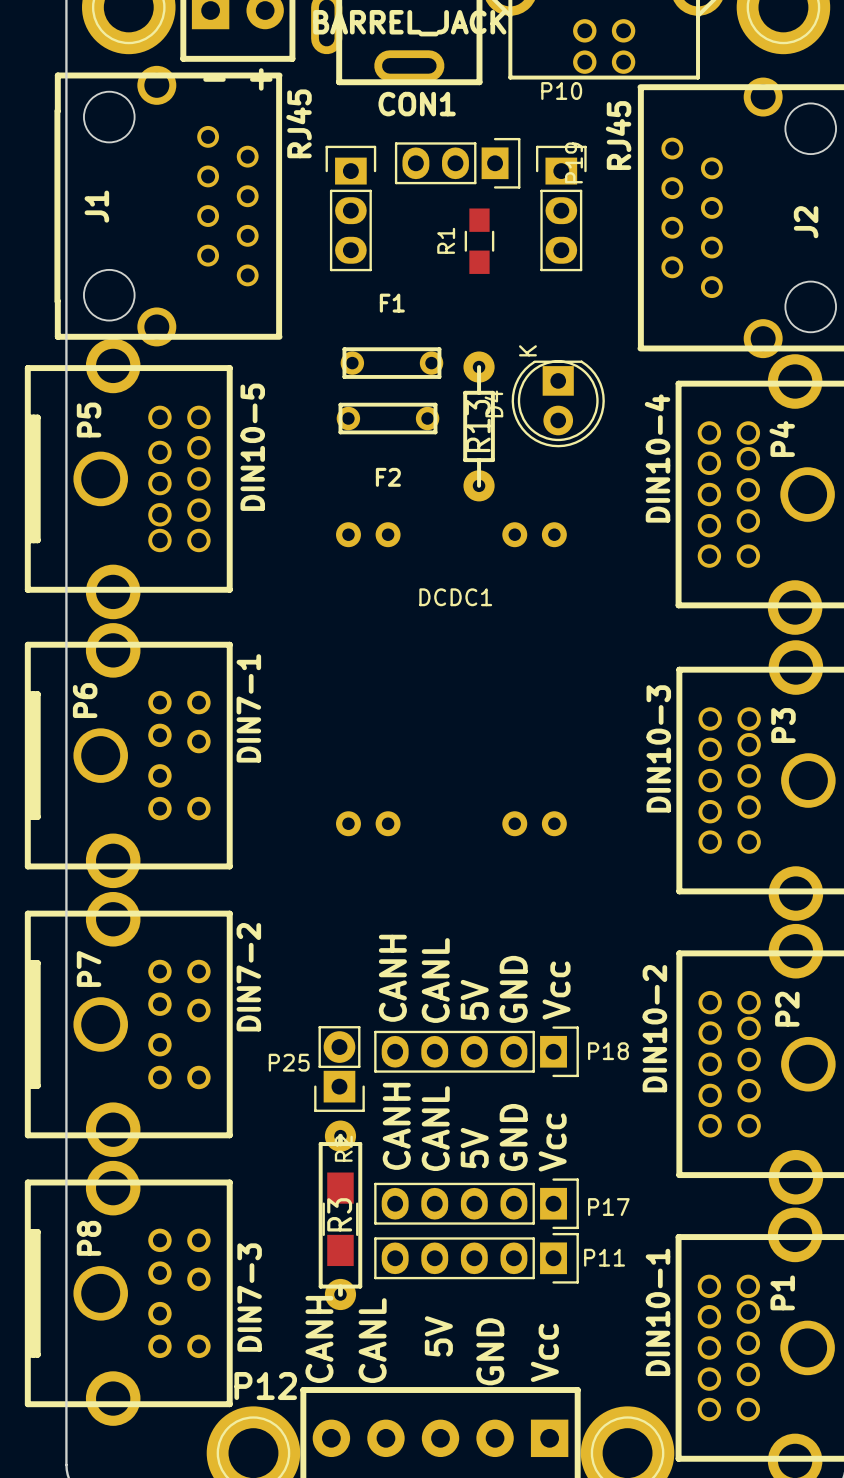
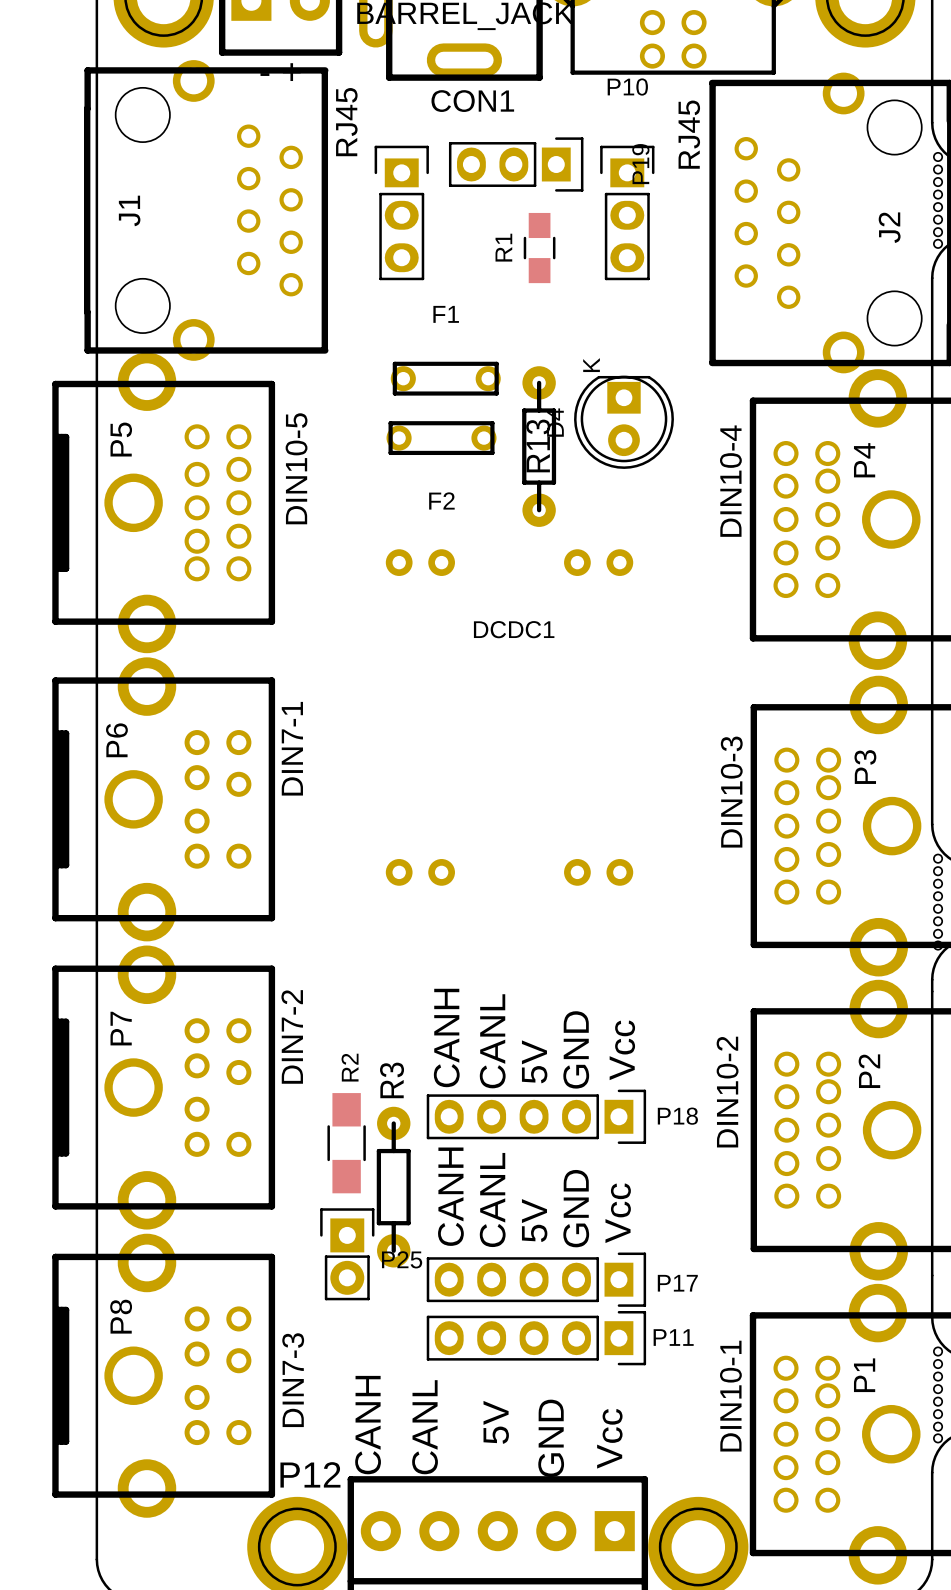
P25 rotation: 0° (339, 1069) -> 180° (347, 1254)
P25 position: (339, 1069) -> (347, 1254)
R3 footprint: [318, 1120, 363, 1311] -> [376, 1106, 411, 1268]
R3 name position: R3 (339, 1214) -> R3 (392, 1080)
R2 position: (340, 1219) -> (346, 1143)

